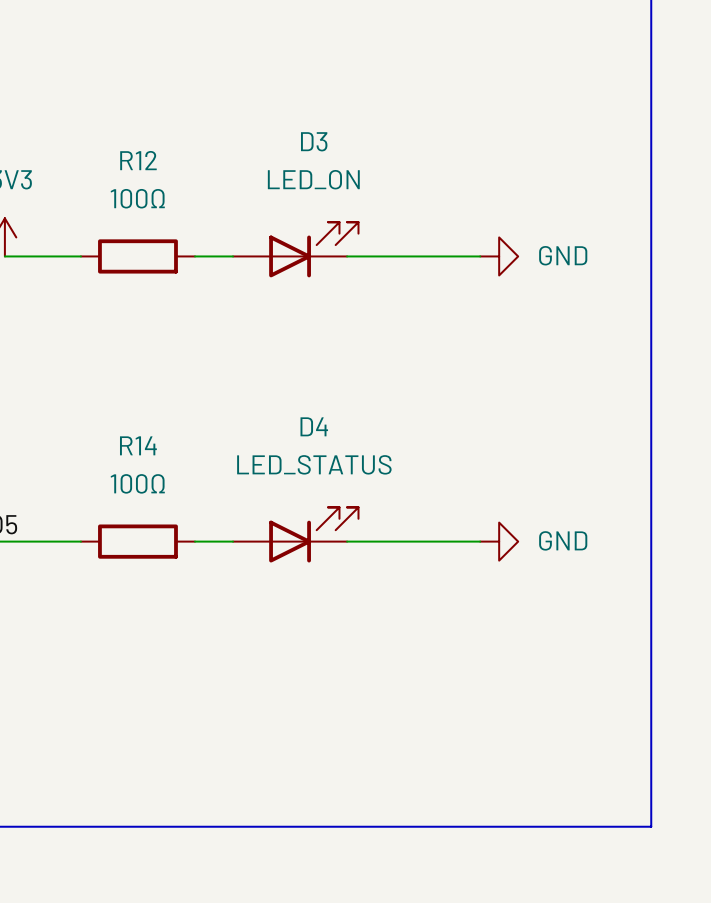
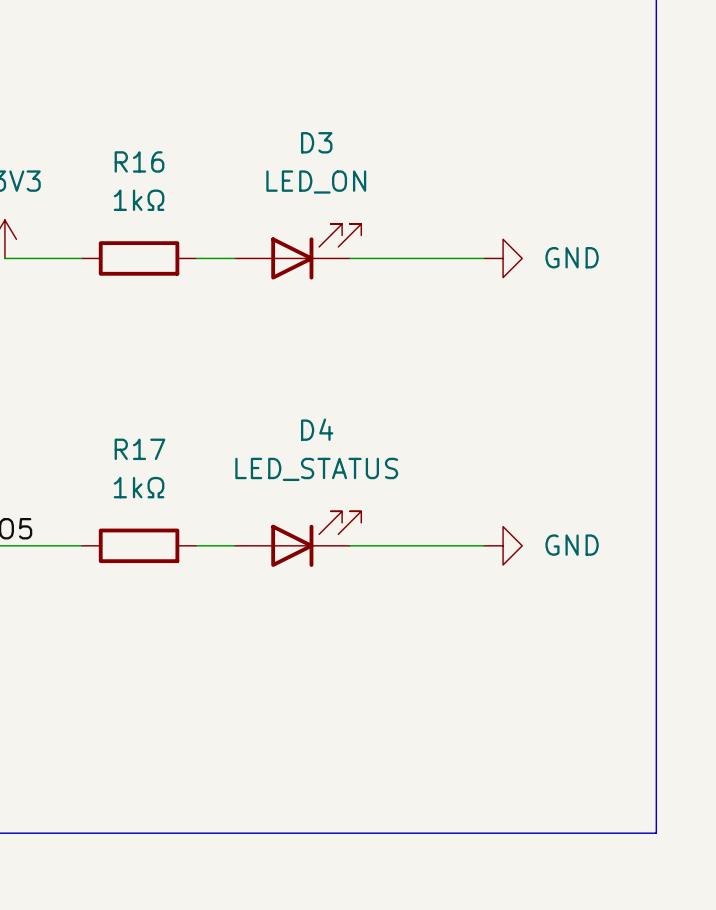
R12 name: R12 (138, 160) -> R16 (139, 161)
R12 value: 100Ω (137, 198) -> 1kΩ (139, 200)
R14 name: R14 (138, 445) -> R17 (139, 449)
R14 value: 100Ω (137, 483) -> 1kΩ (139, 487)

